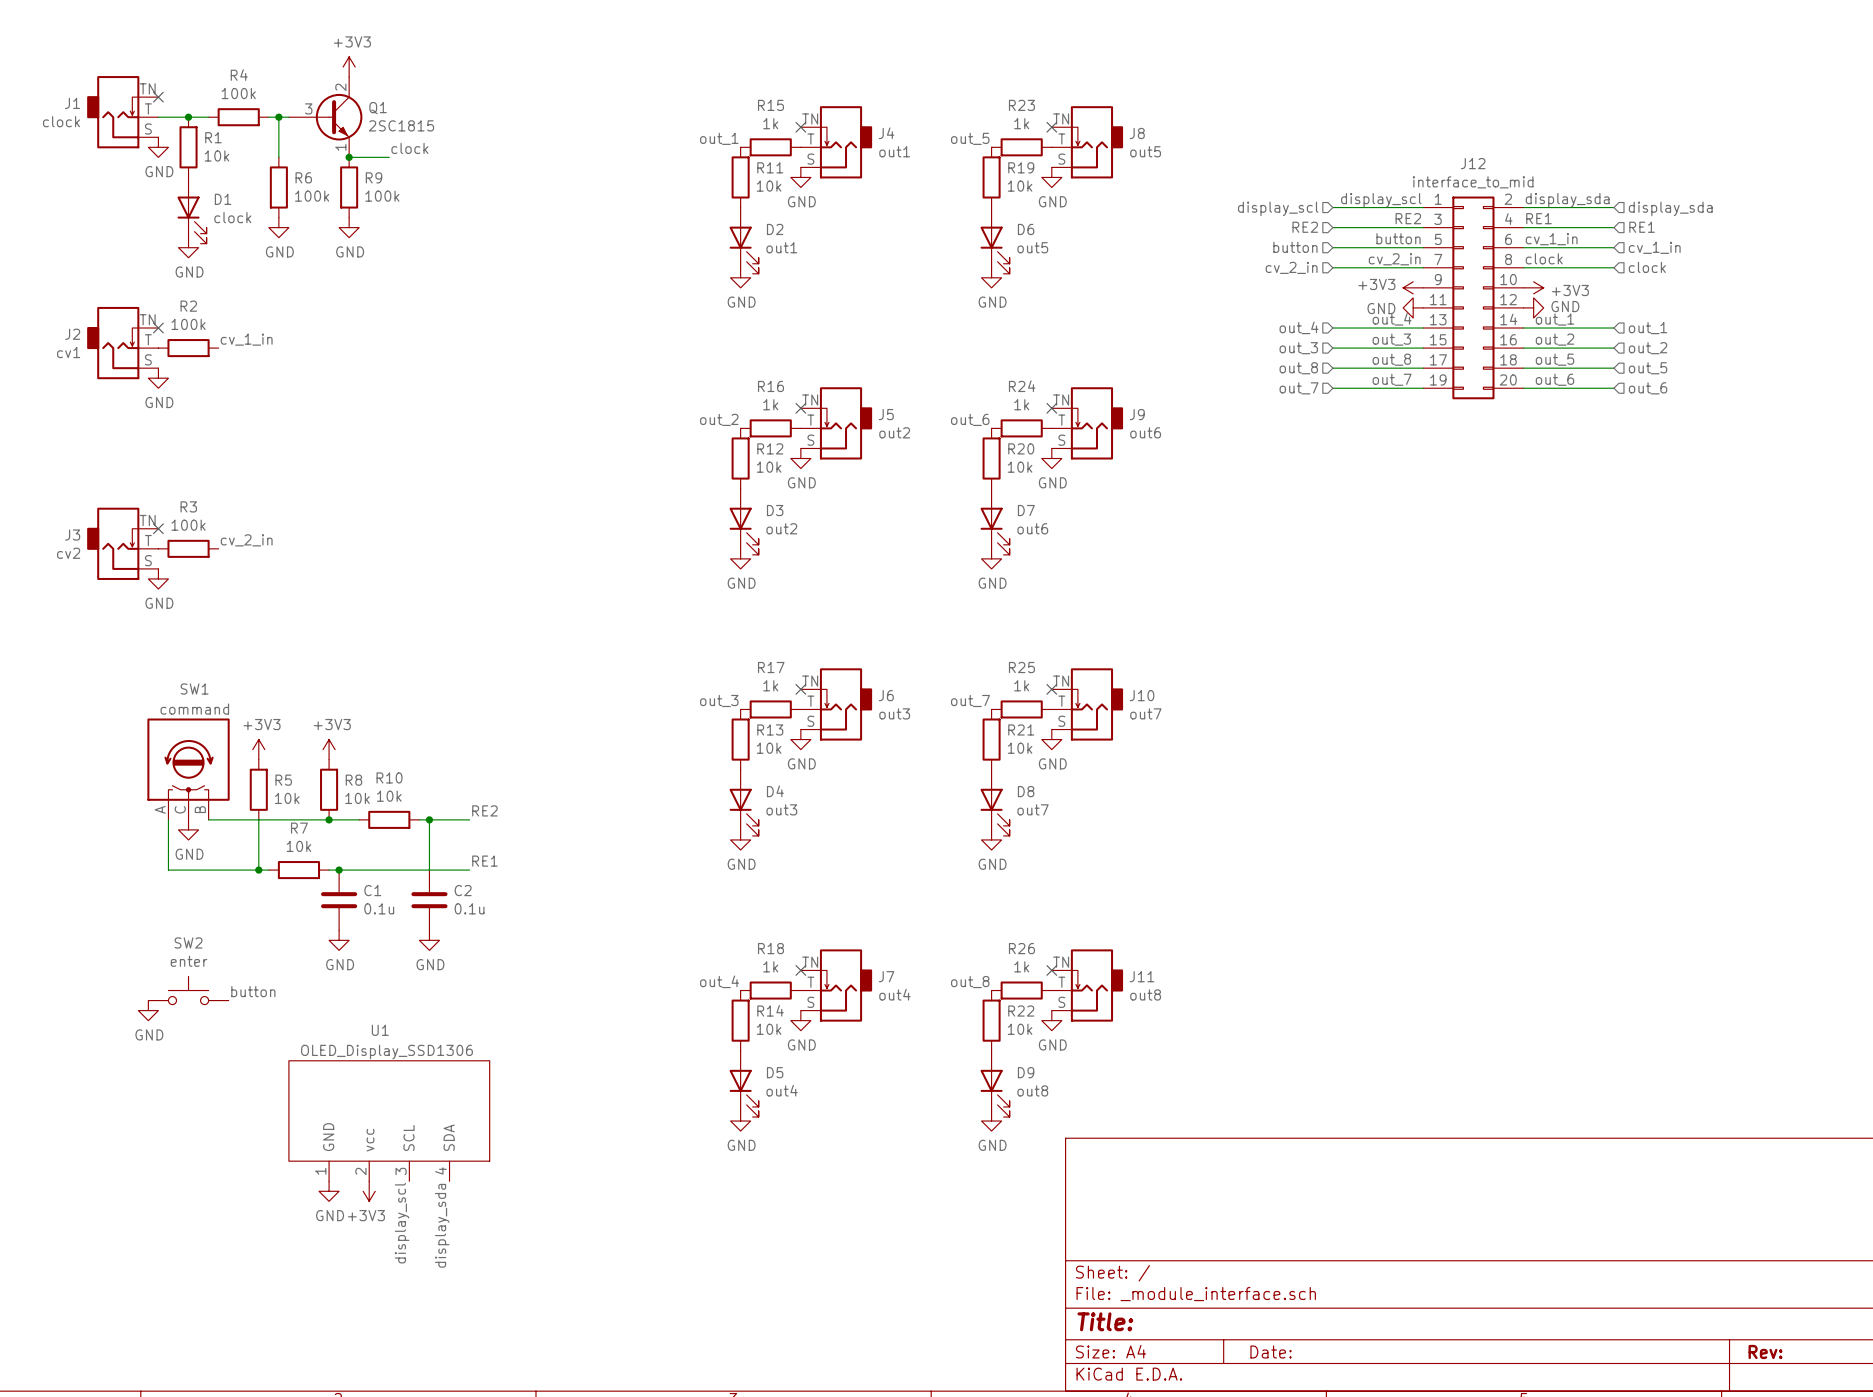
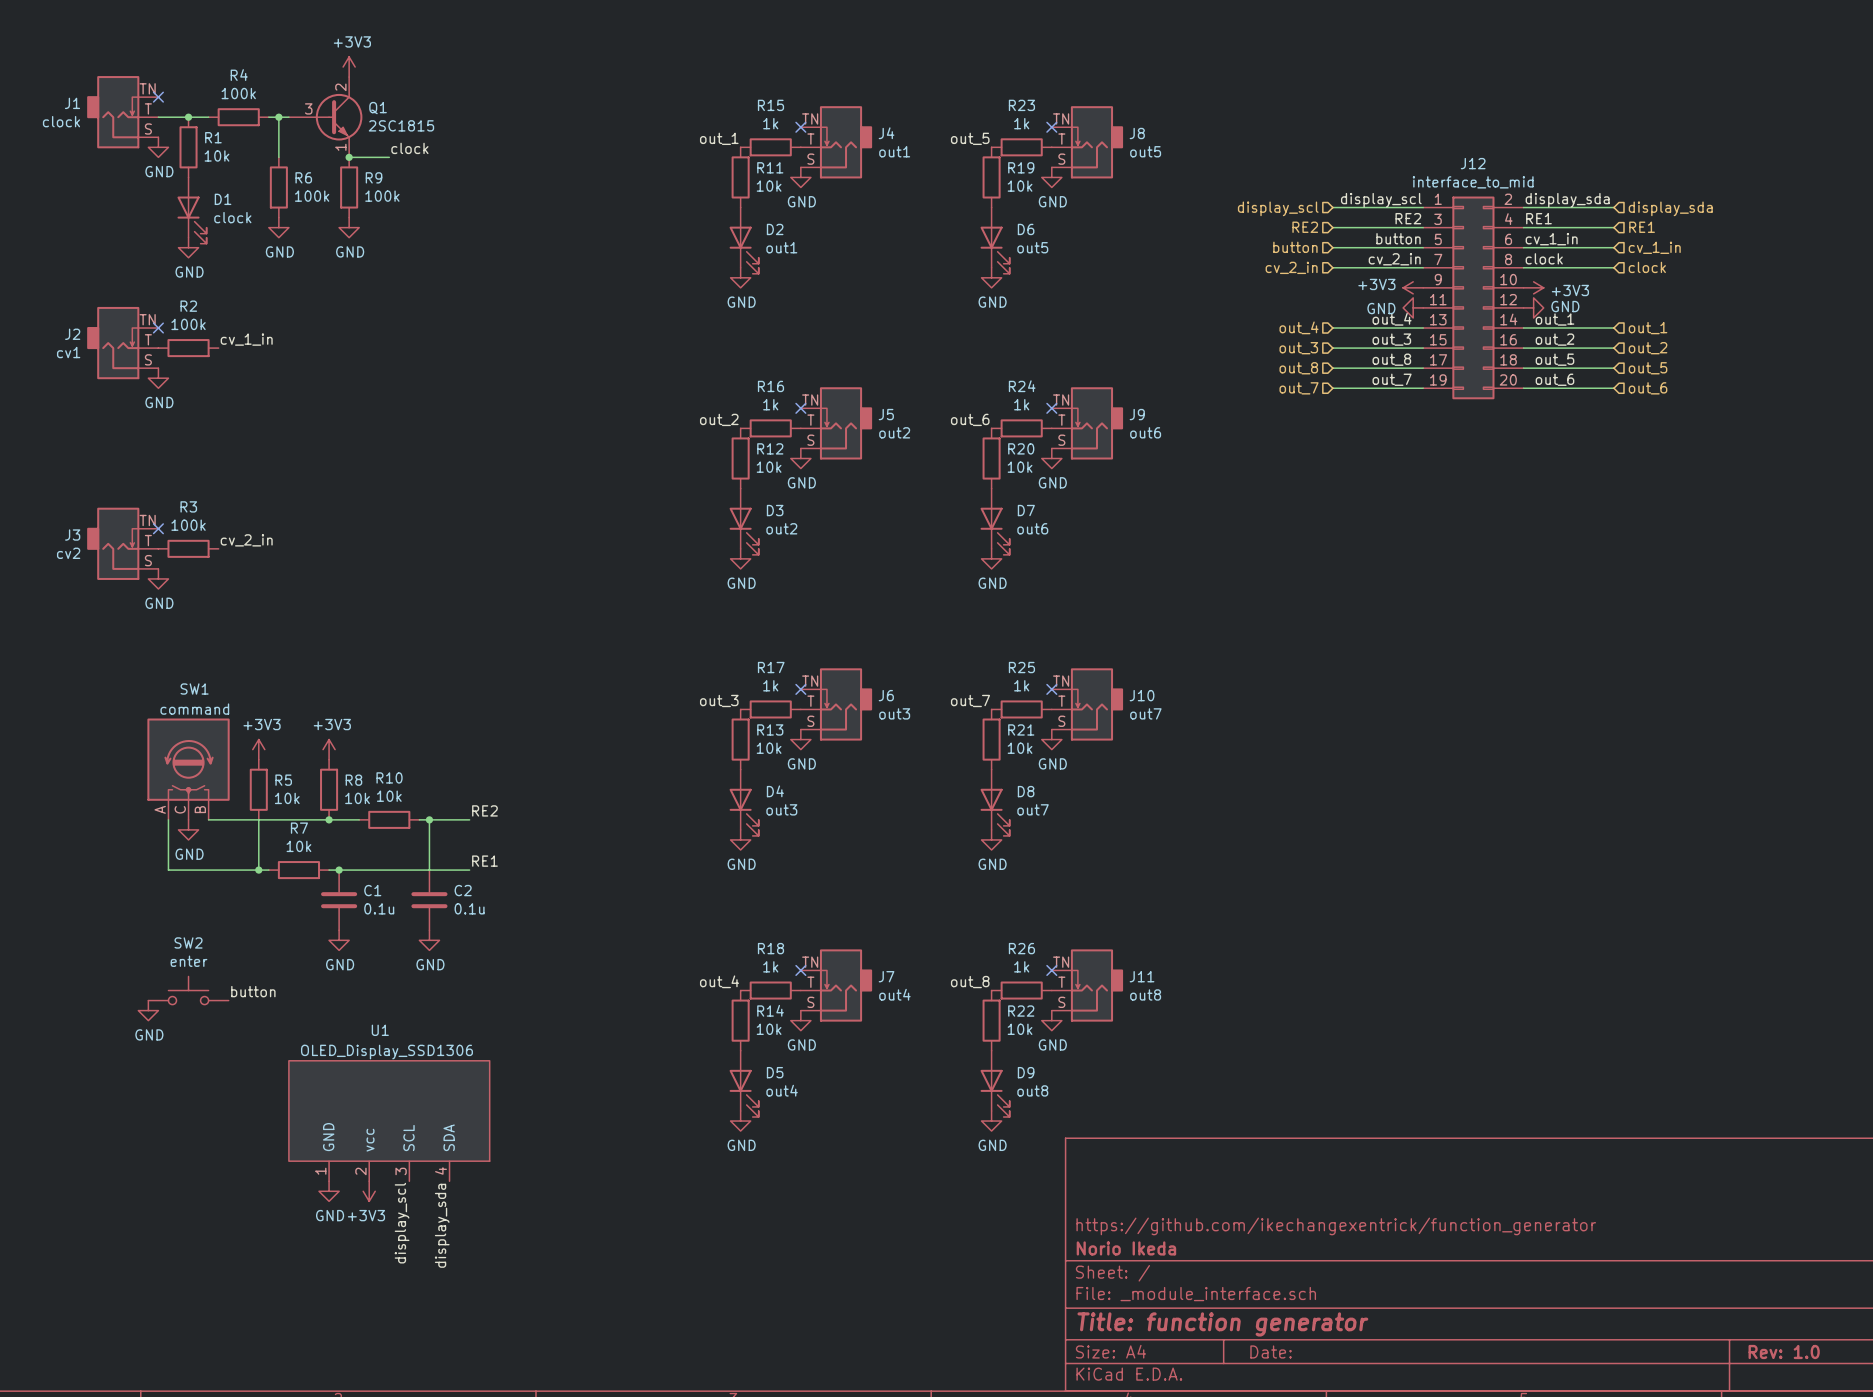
title block: none -> https://github.com/ikechangexentrick/function_generator (1336, 1226)
title block: none -> Norio Ikeda (1126, 1248)
title block: Title: (1105, 1321) -> Title: function generator (1222, 1324)
title block: Rev: (1765, 1351) -> Rev: 1.0 (1784, 1351)

